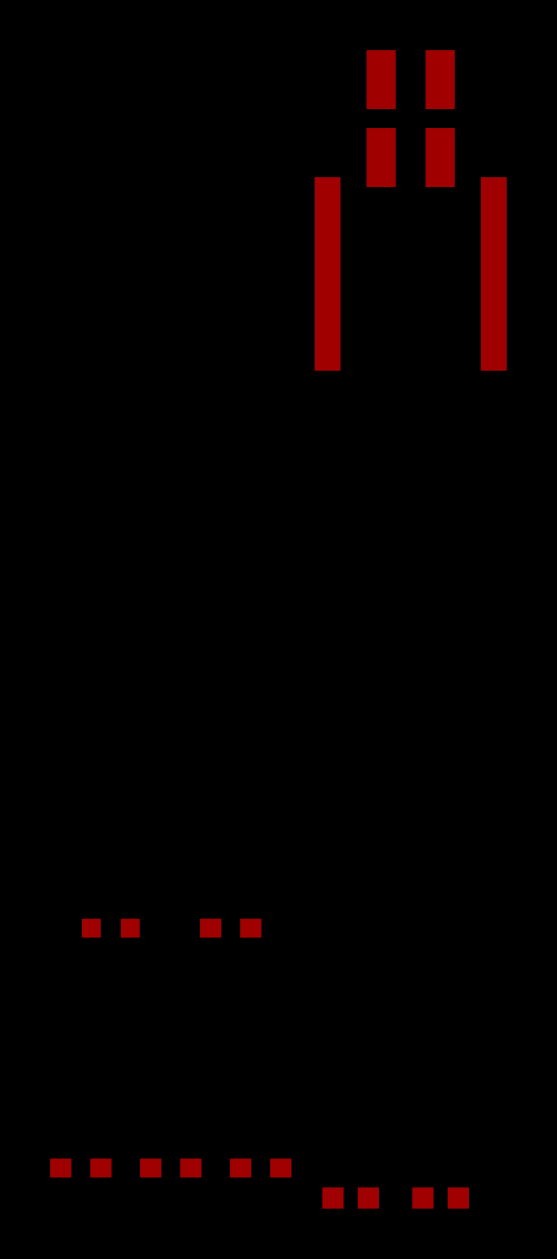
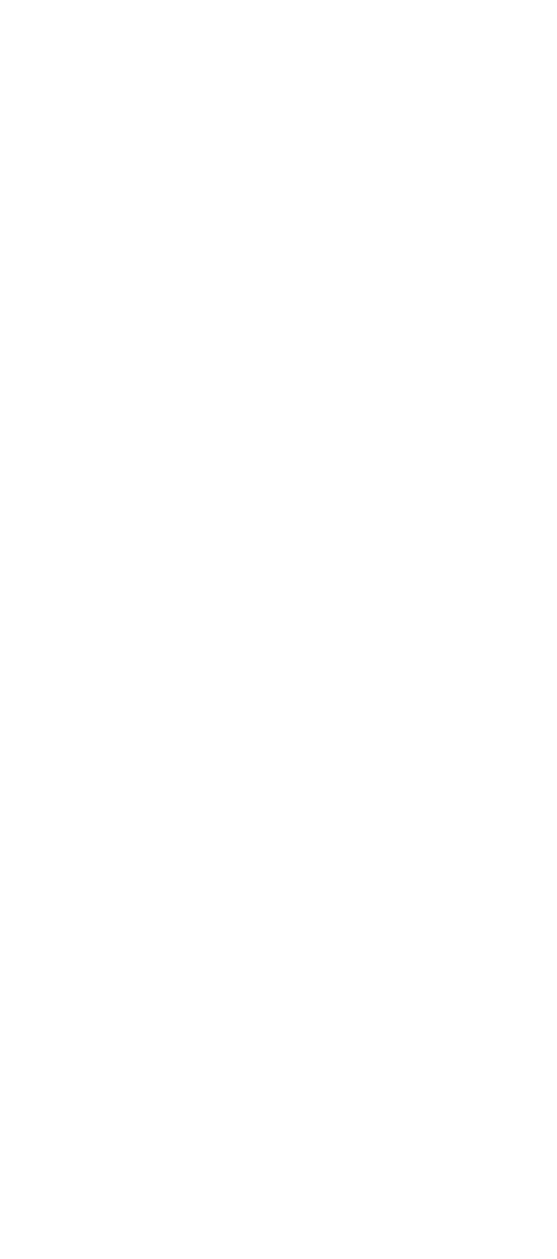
part: (410, 210) -> none
part: (110, 928) -> none
part: (230, 928) -> none
part: (80, 1168) -> none
part: (170, 1168) -> none
part: (260, 1168) -> none
part: (350, 1198) -> none
part: (440, 1198) -> none

